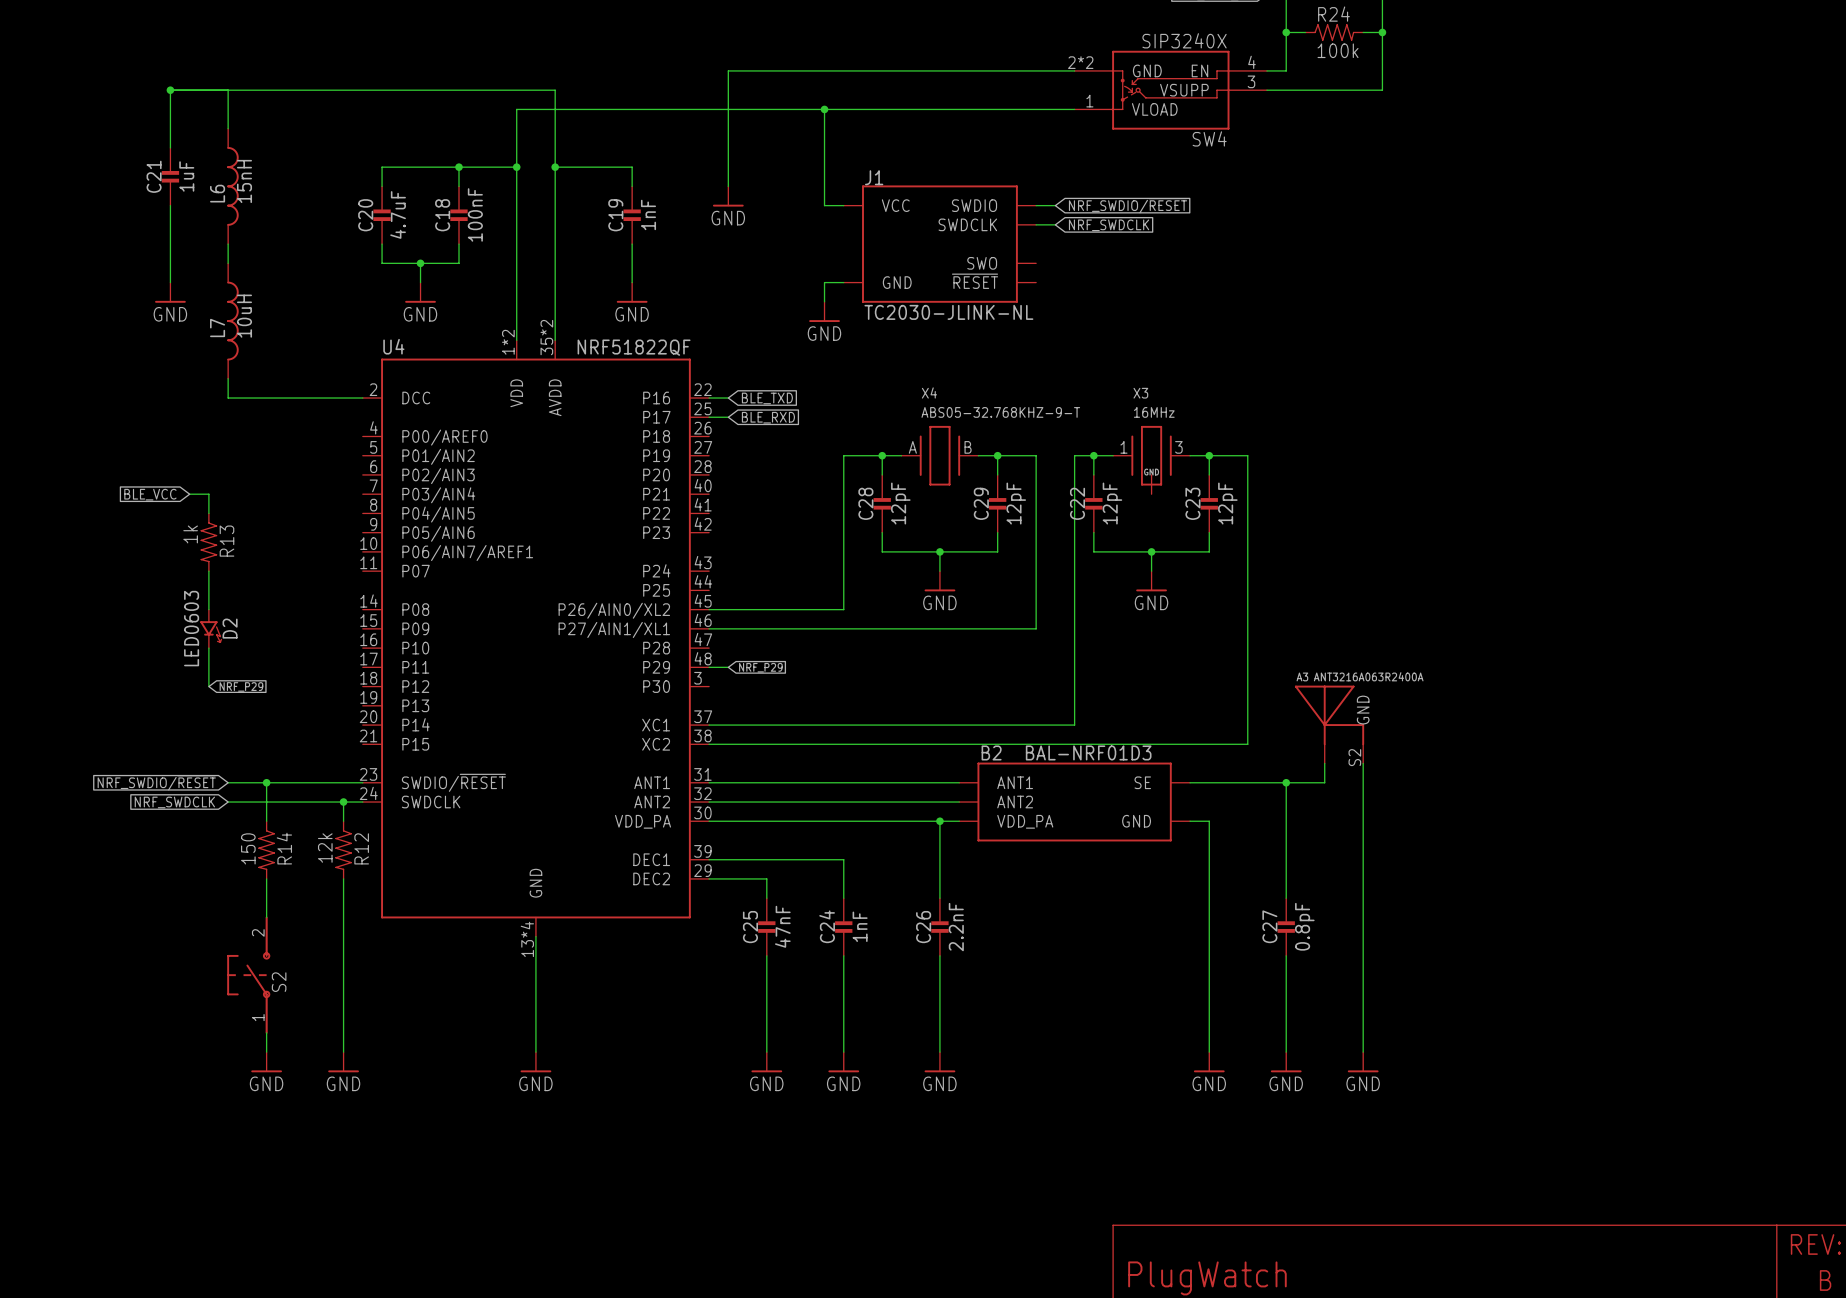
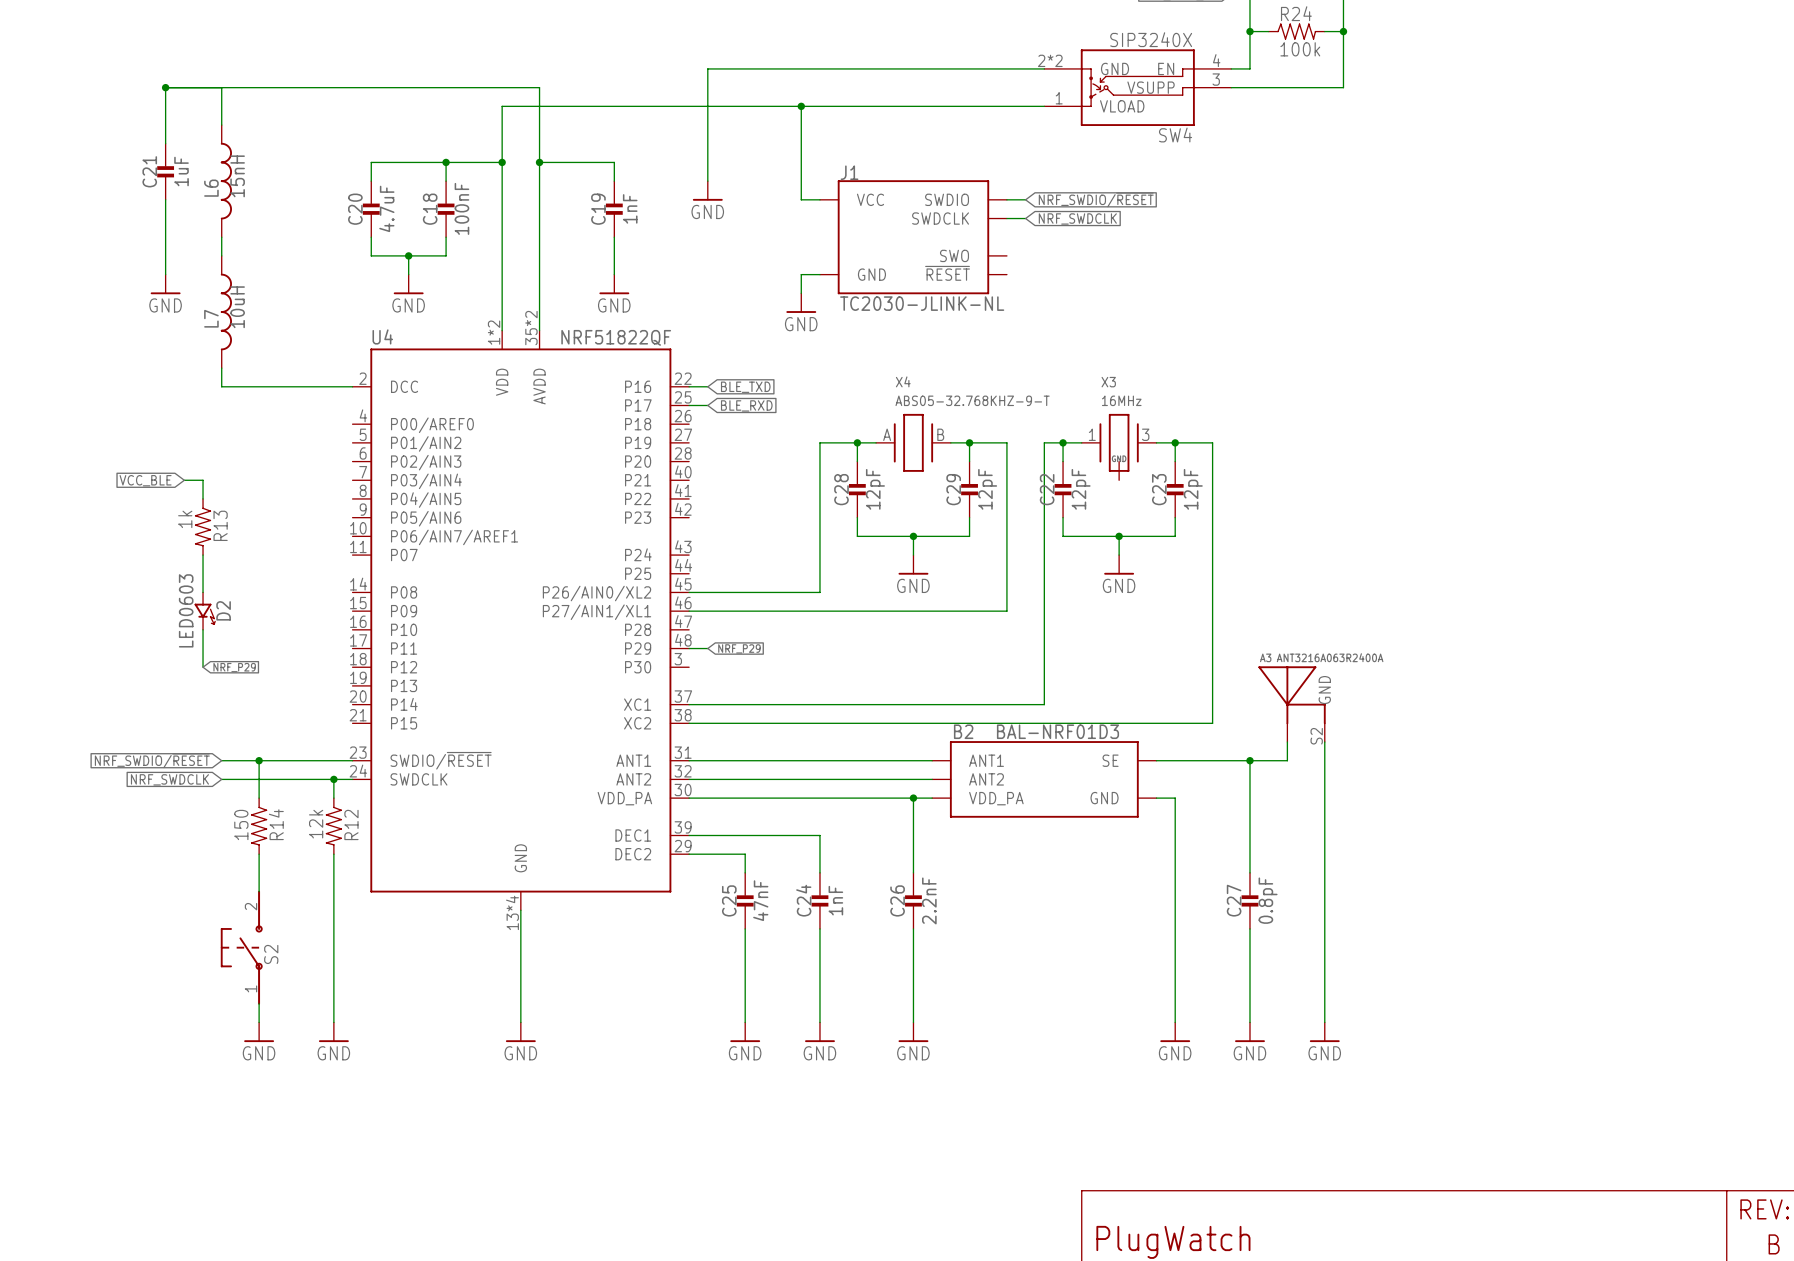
global label: BLE_VCC (150, 494) -> VCC_BLE (145, 480)

